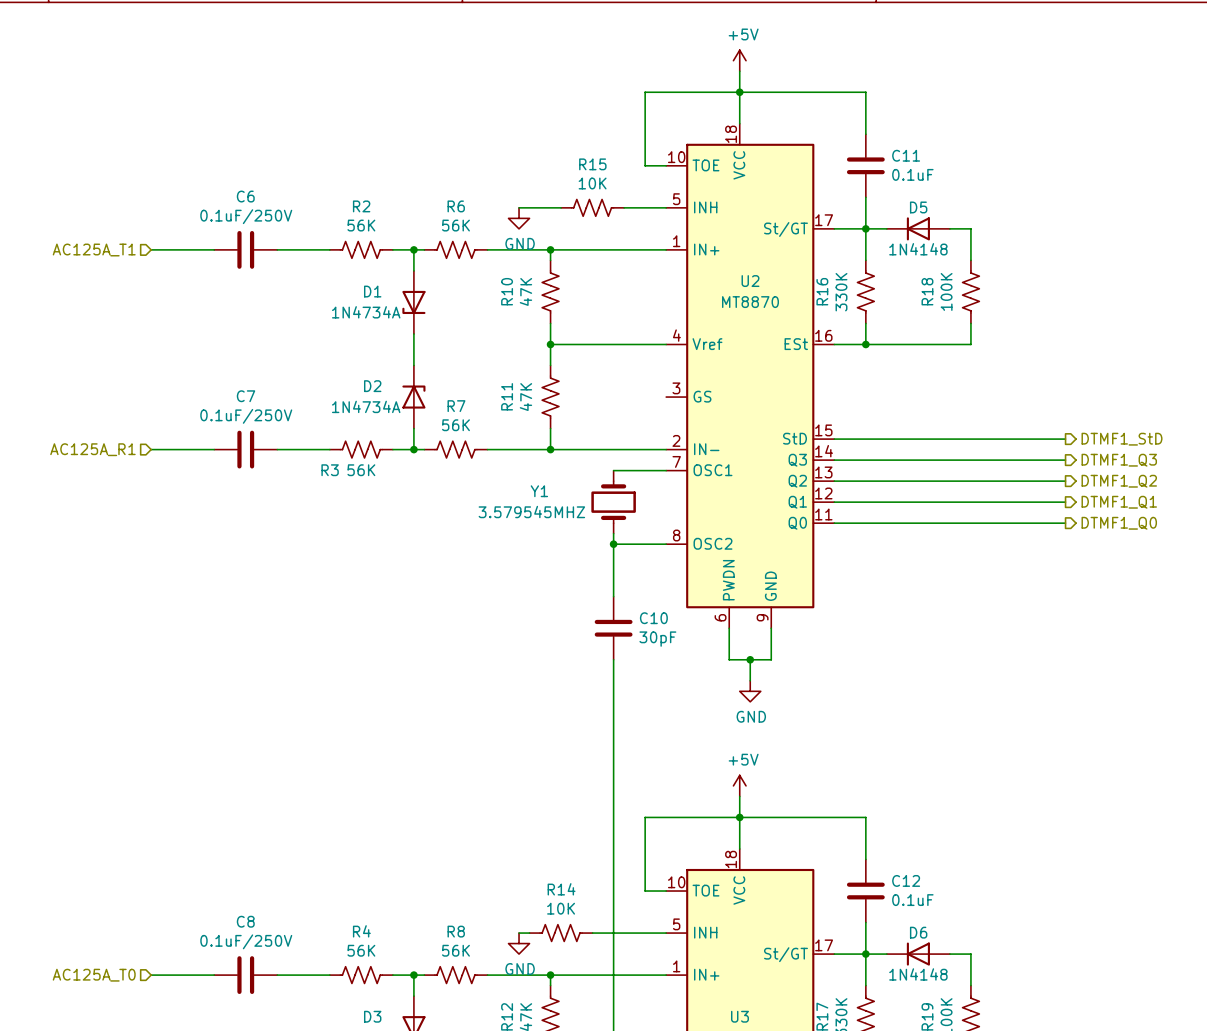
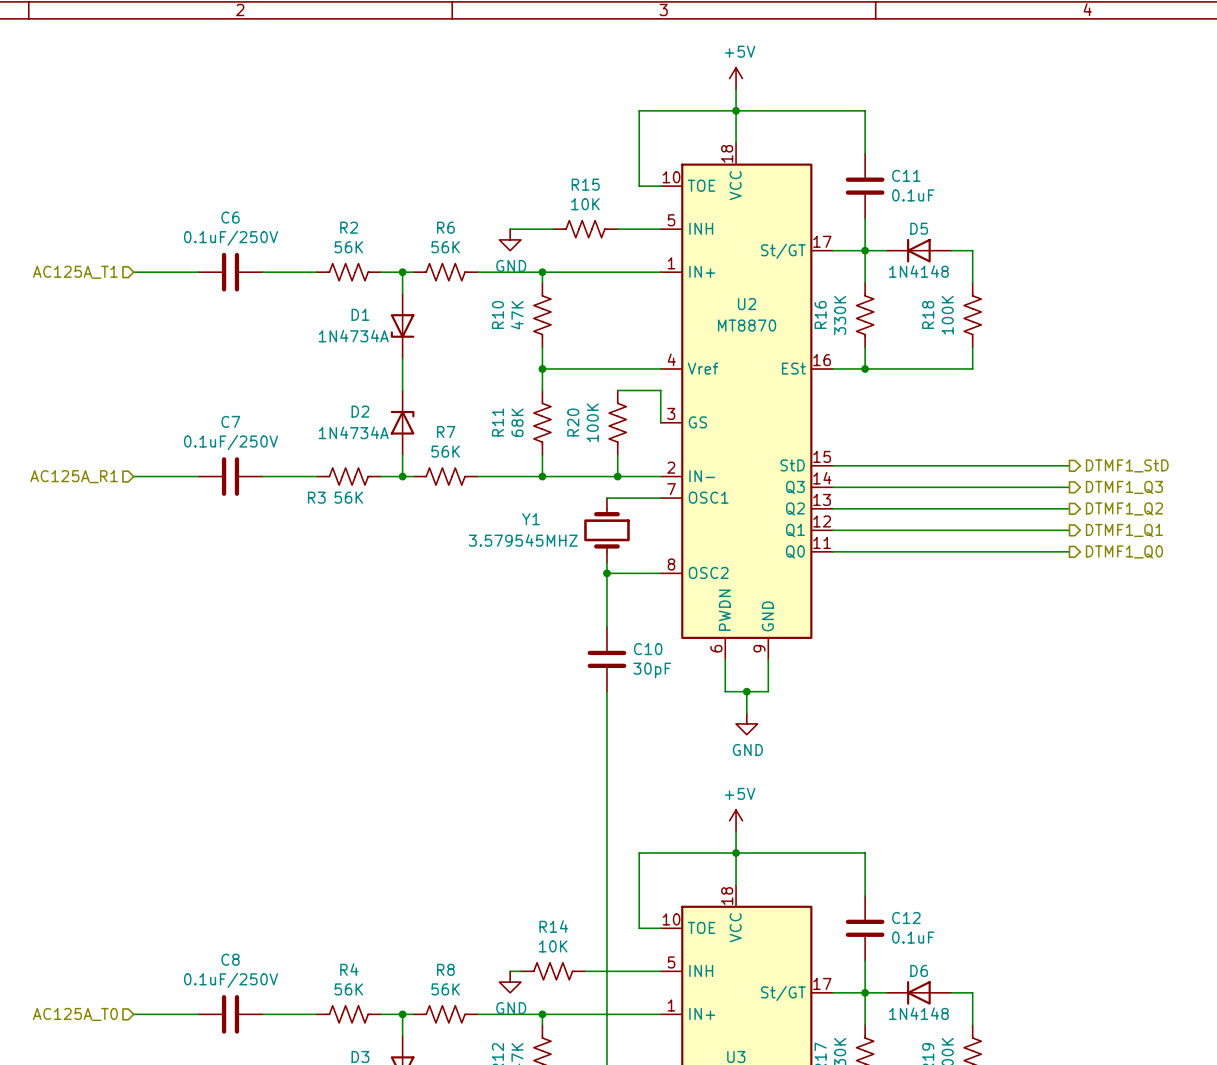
wire: none -> (617, 390) (660, 390) (660, 422)
R11 value: 47K (525, 397) -> 68K (517, 422)
R20: none -> 100K (617, 422)
wire: none -> (617, 455) (617, 476)
junction: none -> (617, 476)

